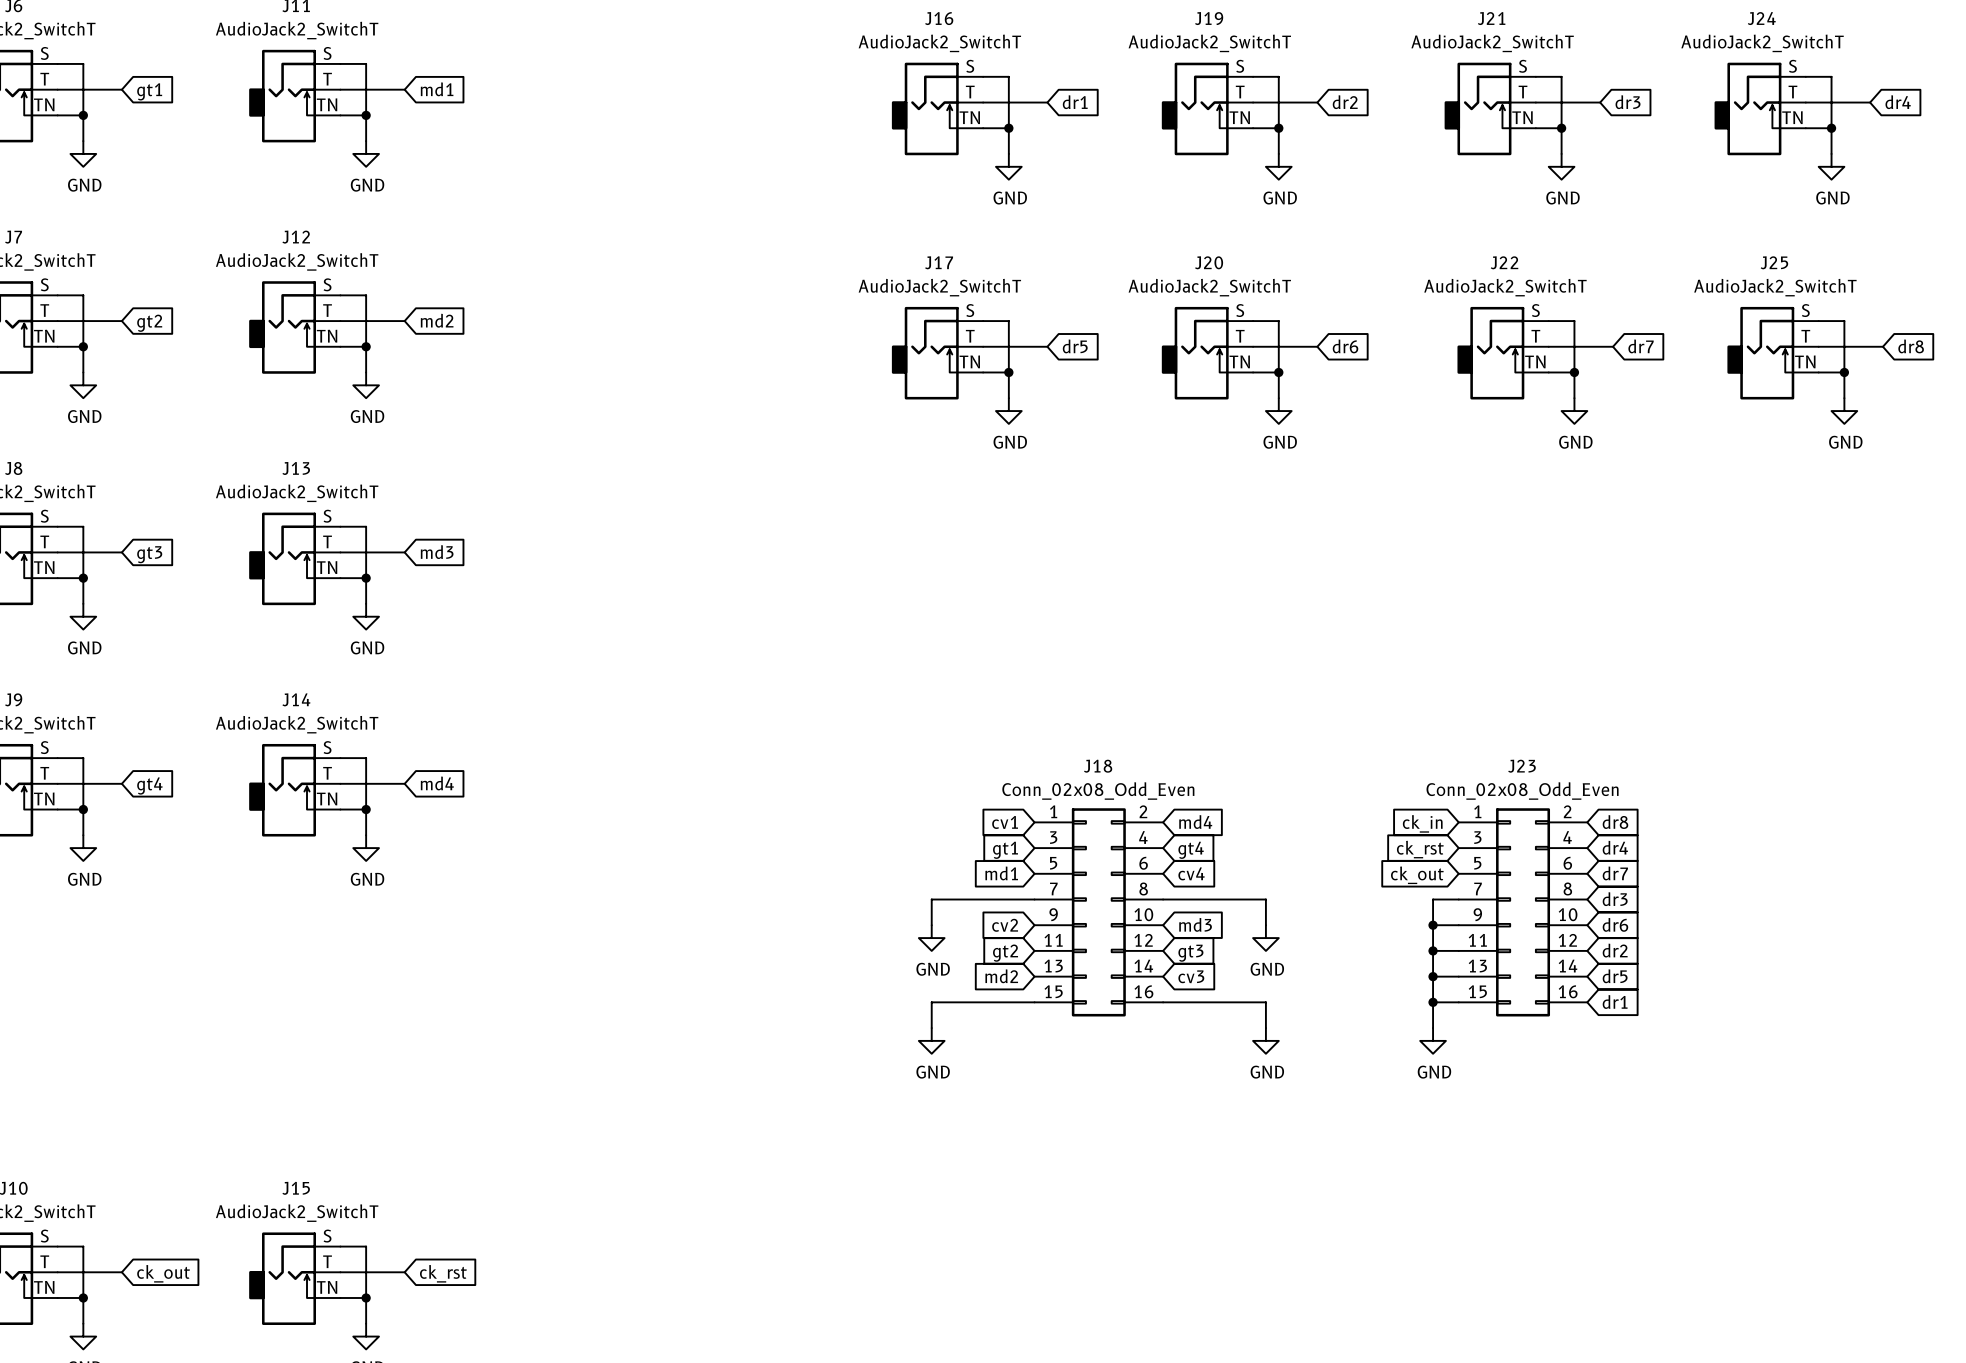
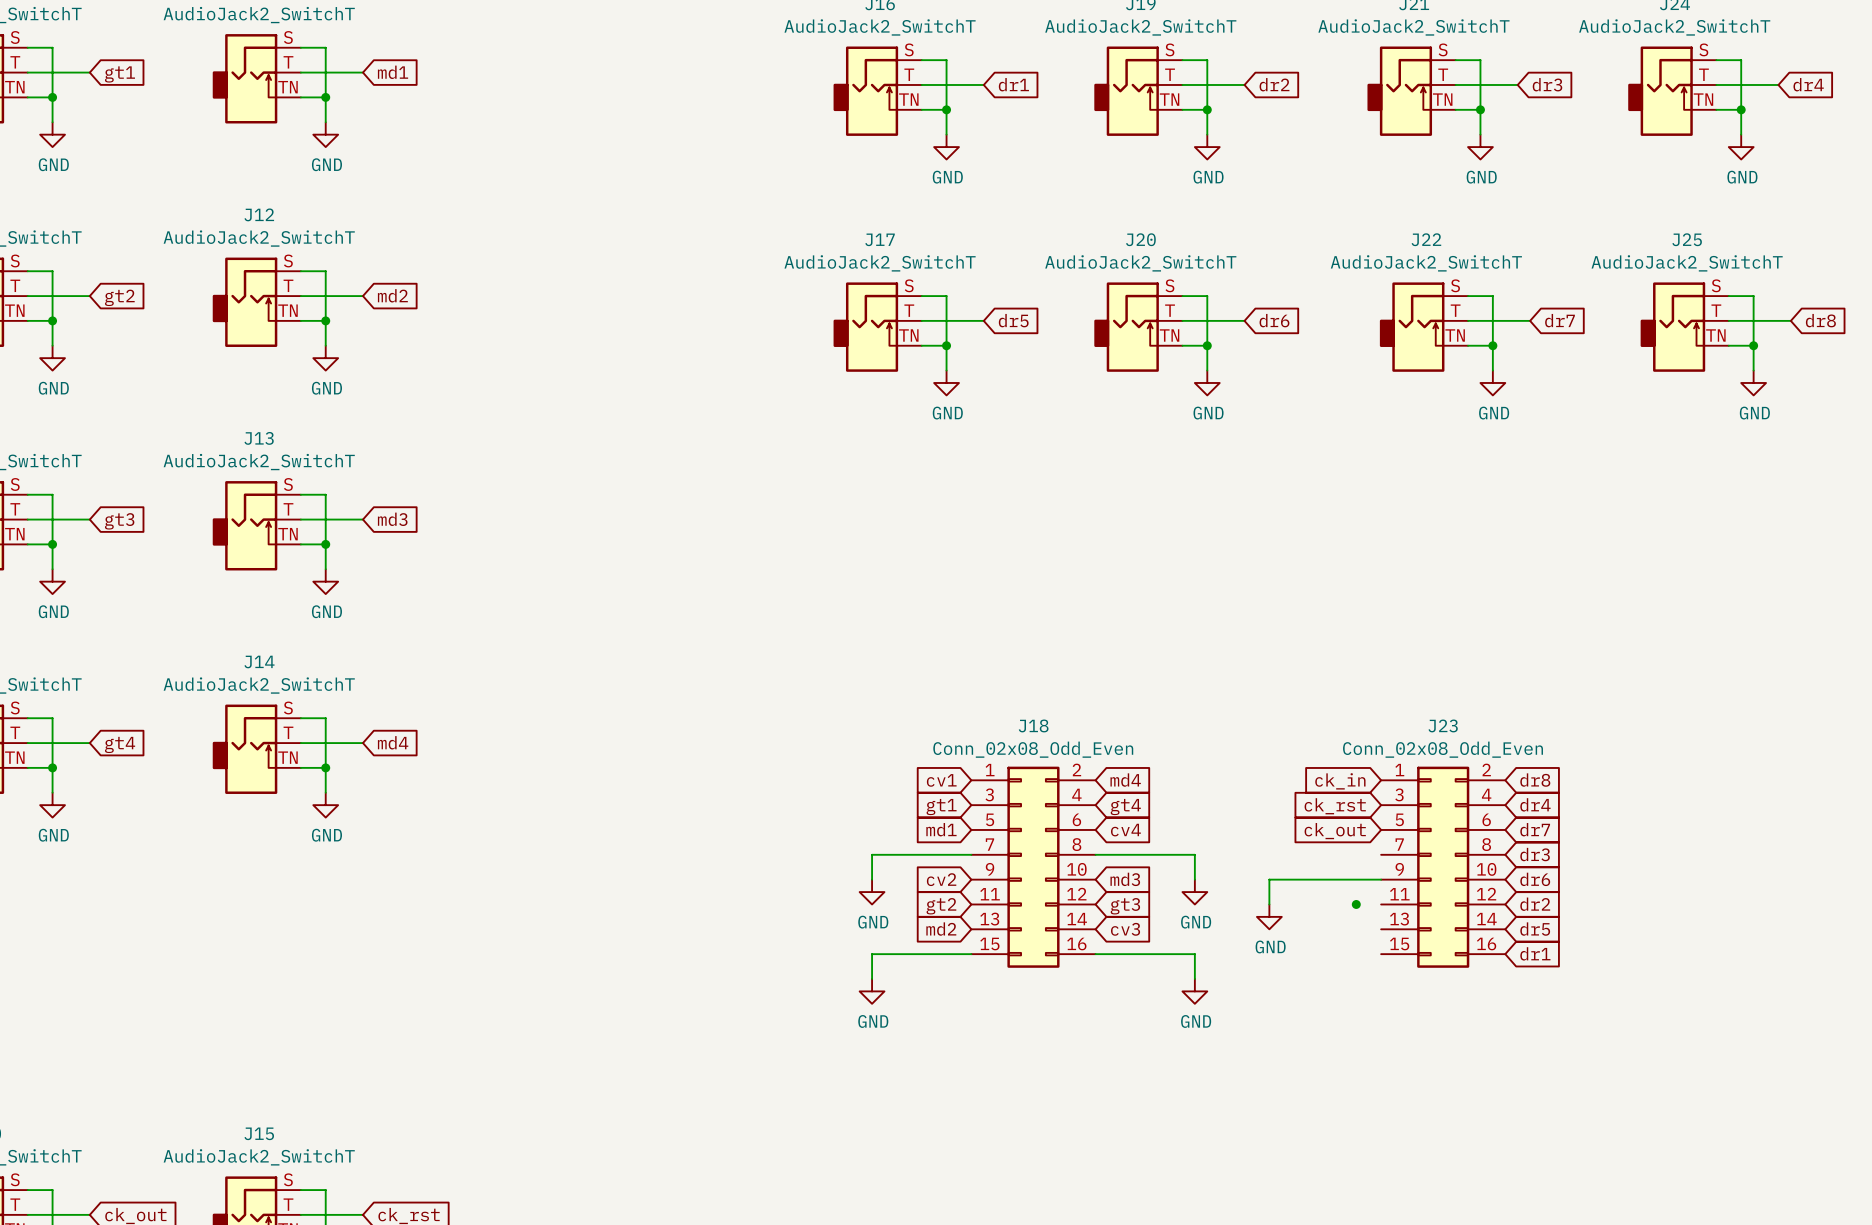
wire: (1458, 899) (1433, 899) (1433, 1028) -> none
wire: none -> (1356, 879) (1269, 879) (1269, 904)
junction: (1433, 925) -> none
wire: (1433, 950) (1458, 950) -> none
wire: (1433, 976) (1458, 976) -> none
junction: (1433, 976) -> none
wire: (1433, 1002) (1458, 1002) -> none
junction: (1433, 1002) -> none
power symbol position: GND (1433, 1040) -> GND (1269, 916)

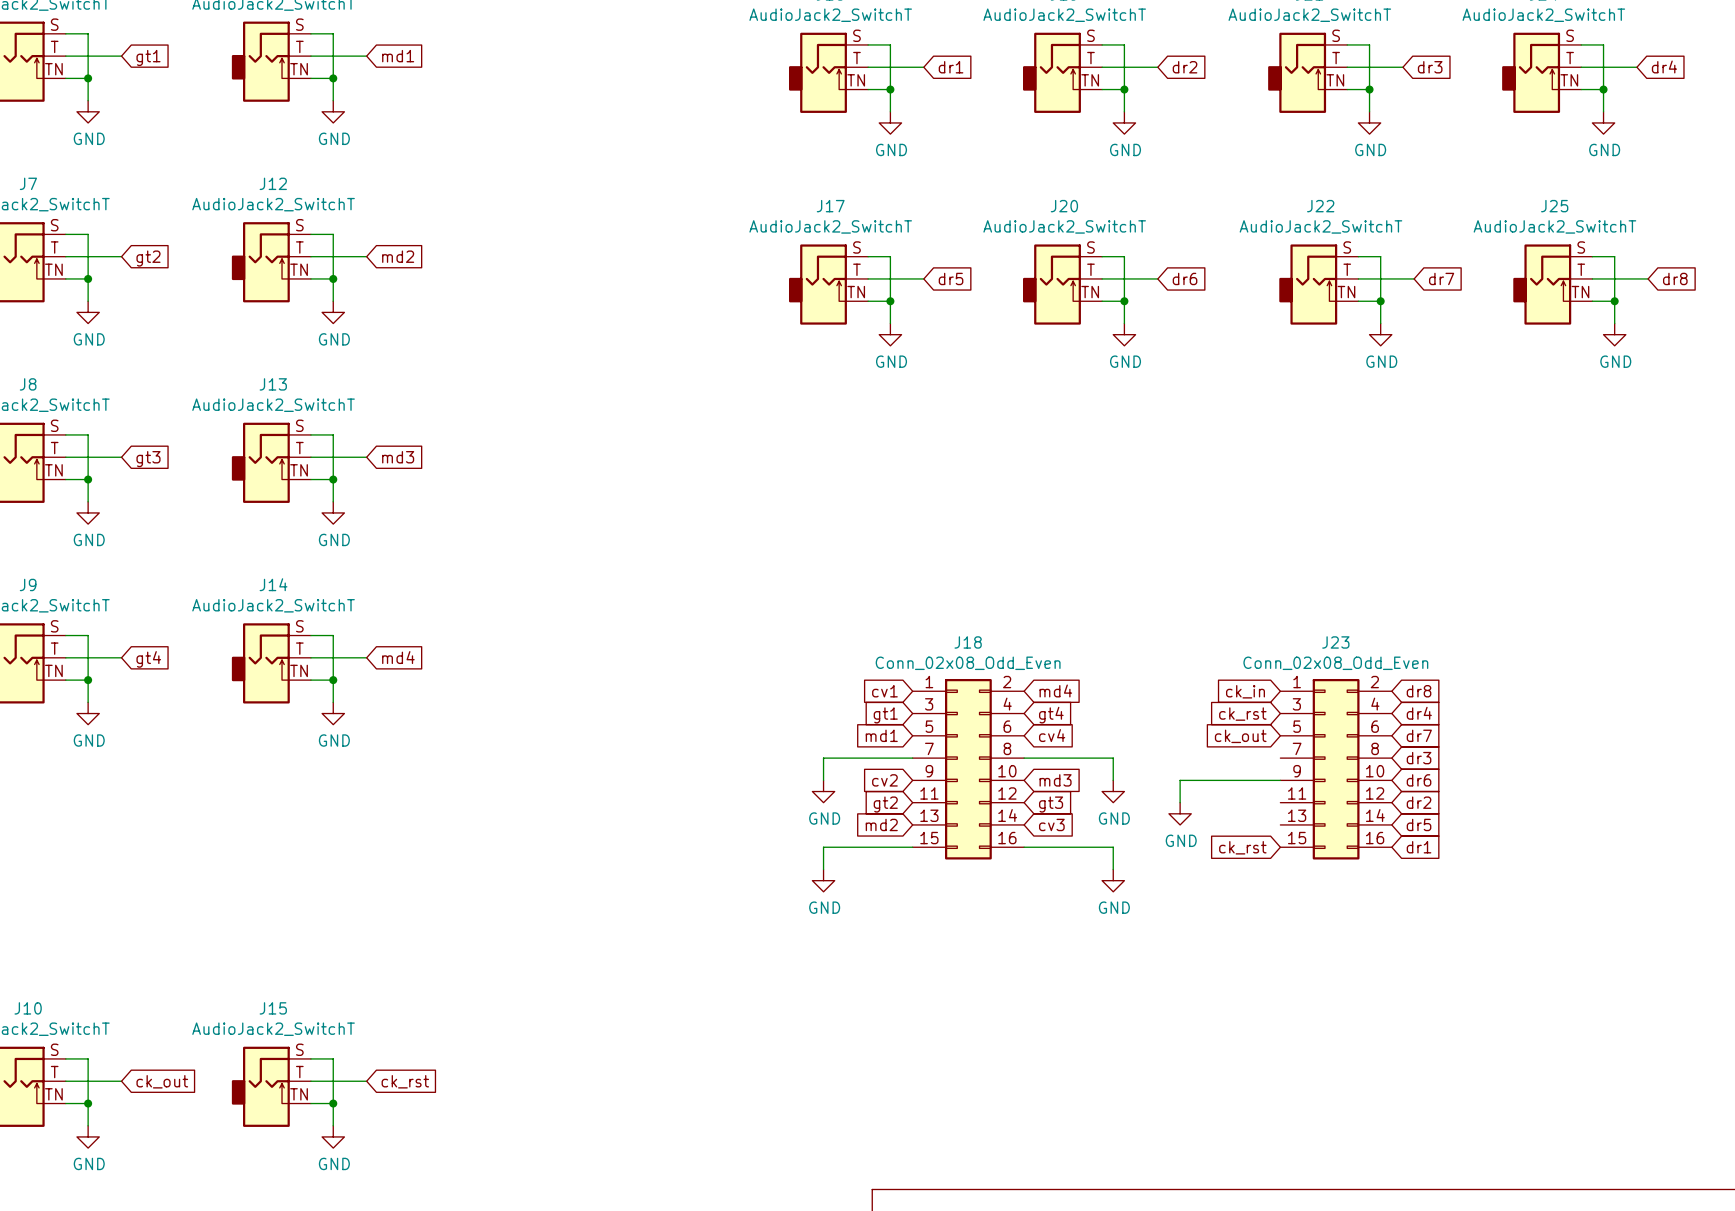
junction: (1356, 904) -> none
global label: none -> ck_rst (1242, 847)

